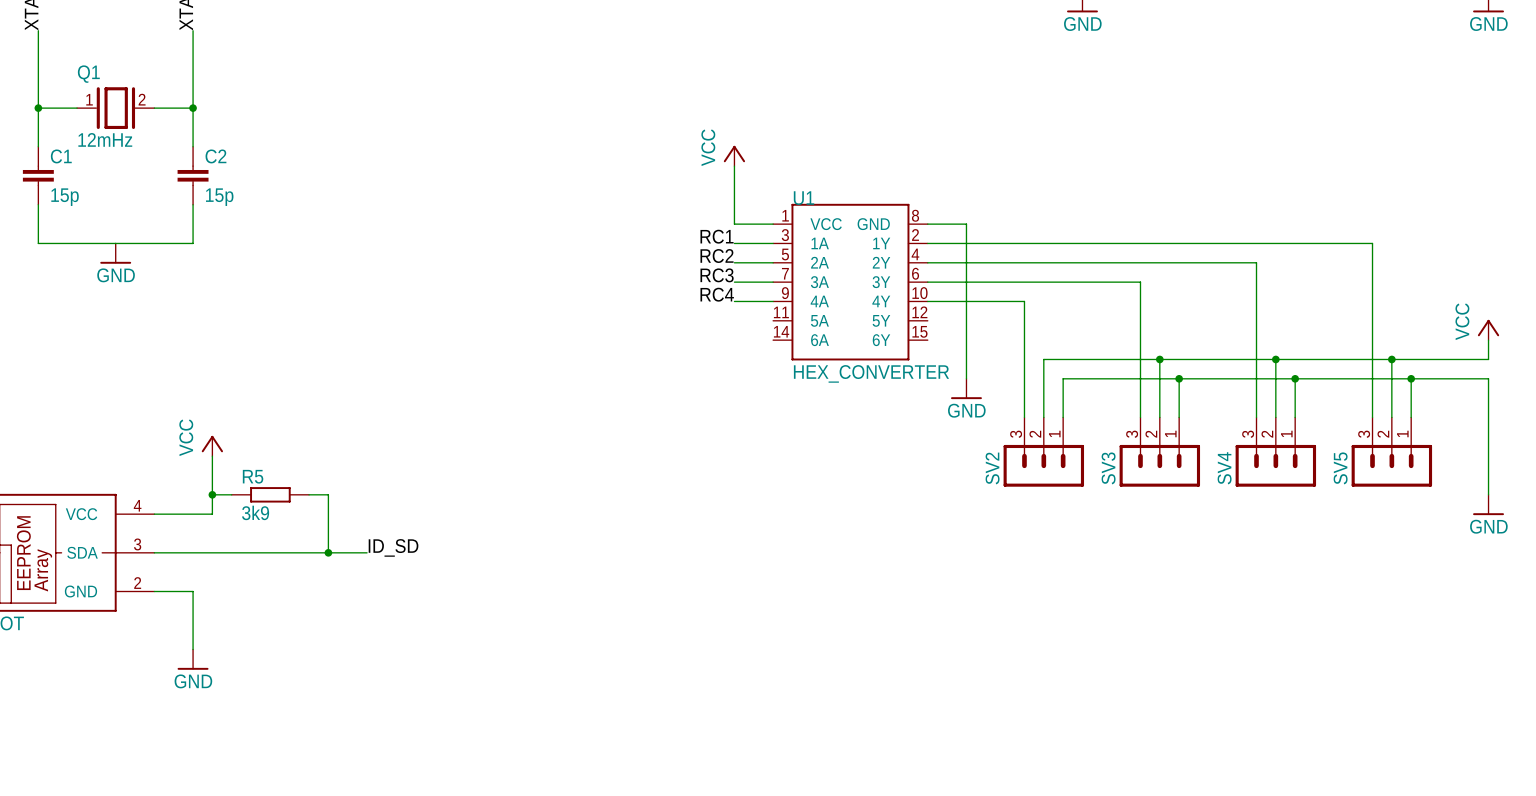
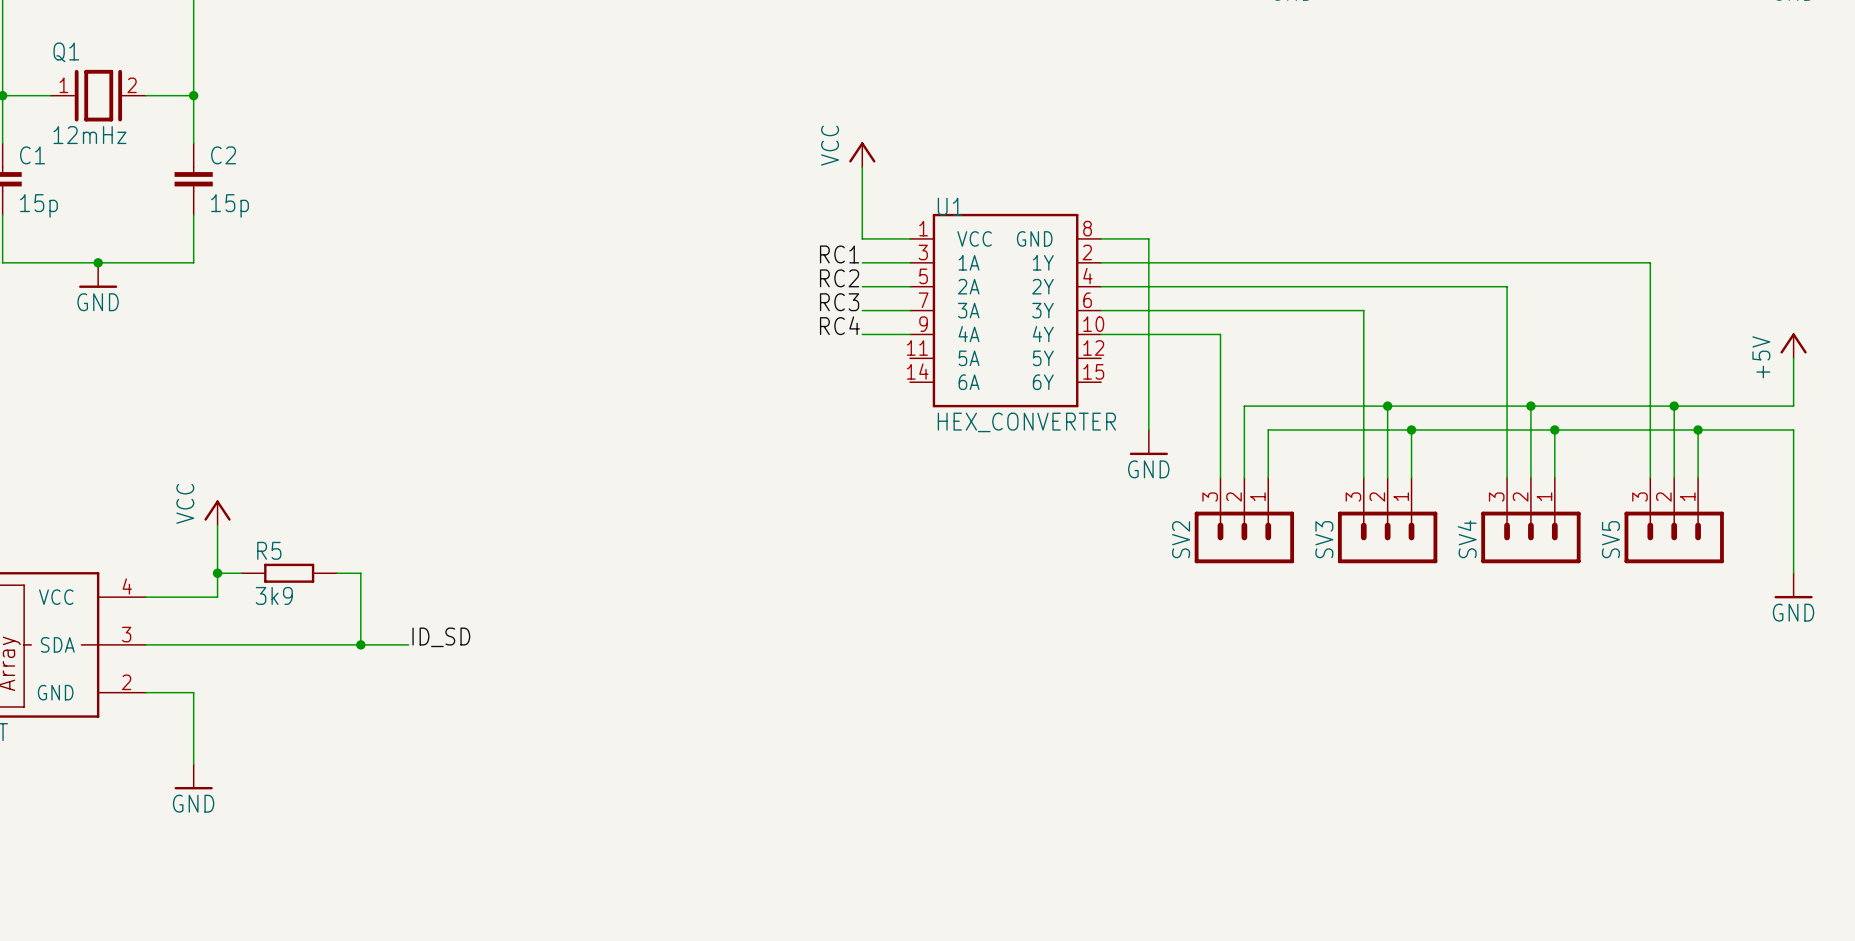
junction: none -> (98, 262)
power symbol: none -> +5V (1793, 345)
power symbol: VCC (1488, 329) -> none

